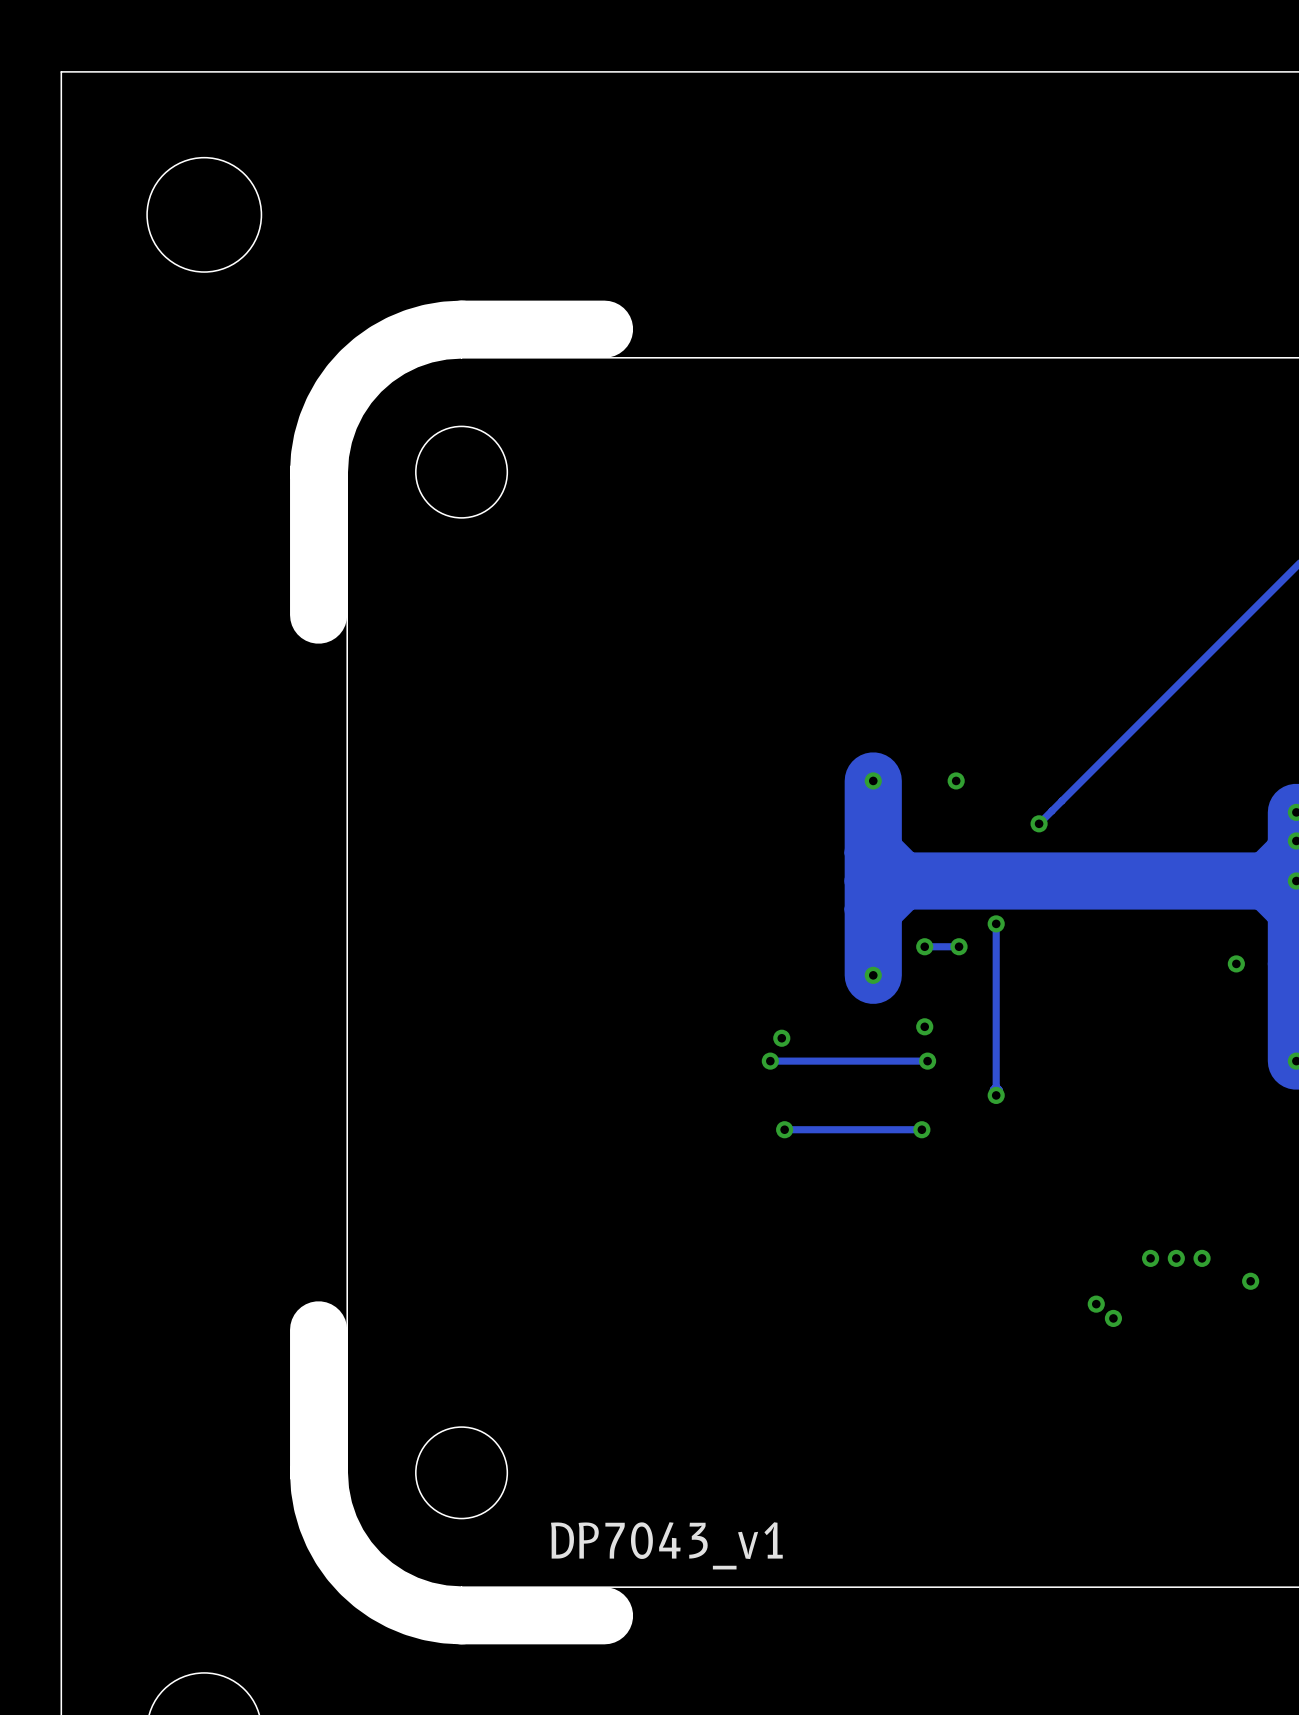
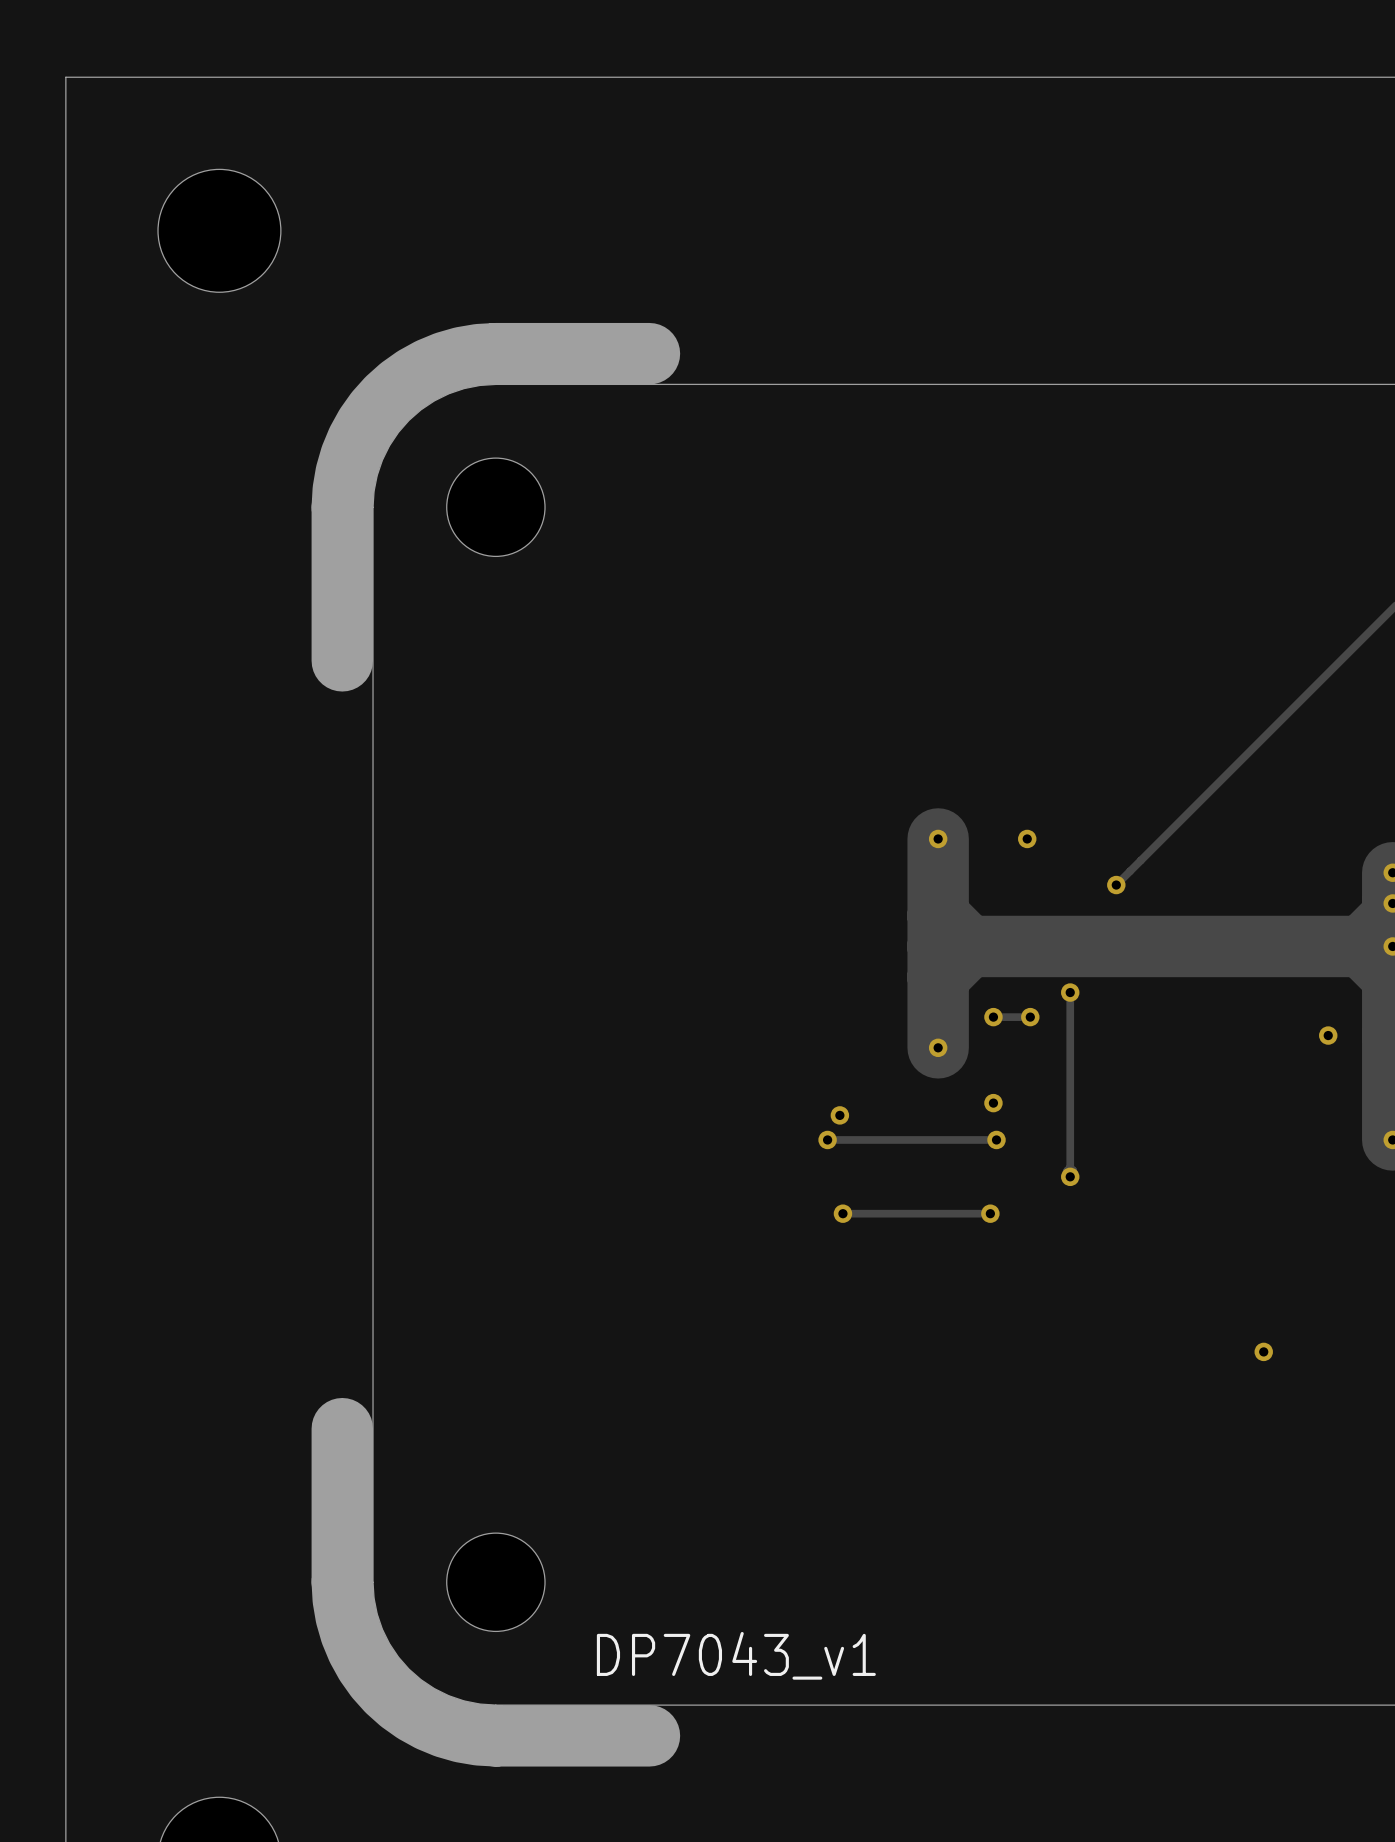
via: (1150, 1258) -> none
via: (1202, 1258) -> none
via: (1250, 1281) -> none
via: (1096, 1304) -> none
via: (1113, 1318) -> none

